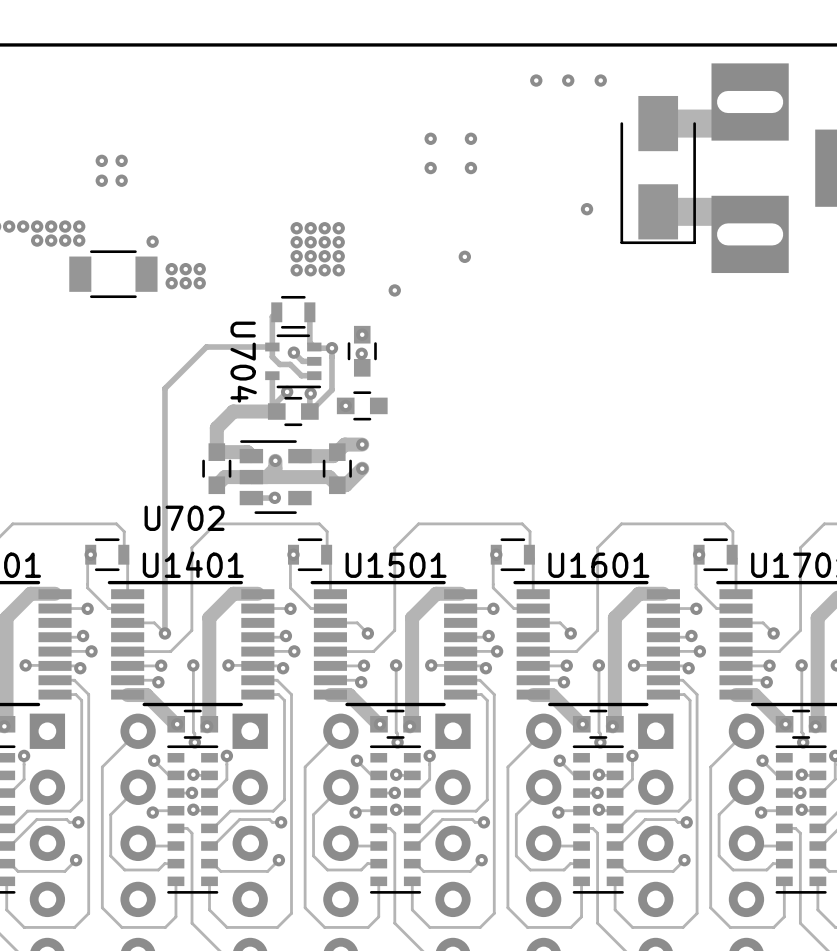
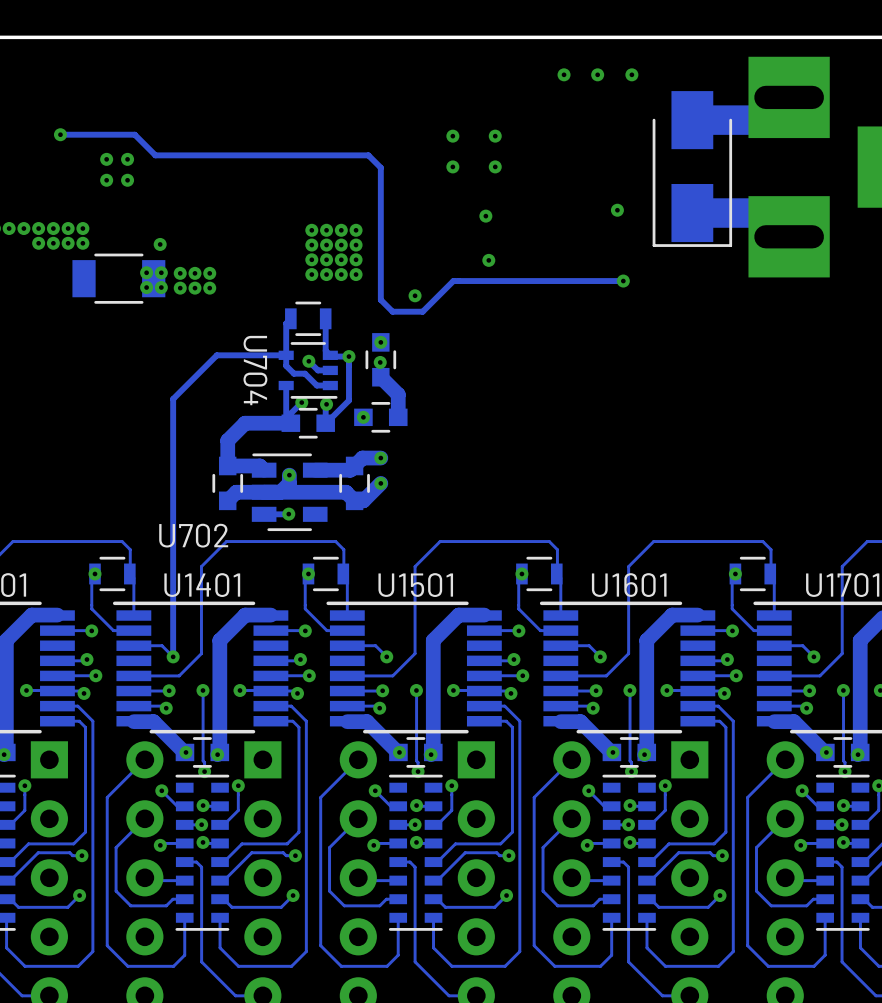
track: none -> (60, 134) (134, 134) (155, 155) (368, 155) (380, 167) (380, 299) (392, 311) (422, 311) (453, 281) (623, 281)
via: none -> (60, 134)
via: none -> (485, 216)
via: none -> (146, 272)
via: none -> (161, 272)
via: none -> (623, 281)
via: none -> (146, 287)
via: none -> (161, 287)
track: none -> (380, 377) (398, 394) (398, 417)

